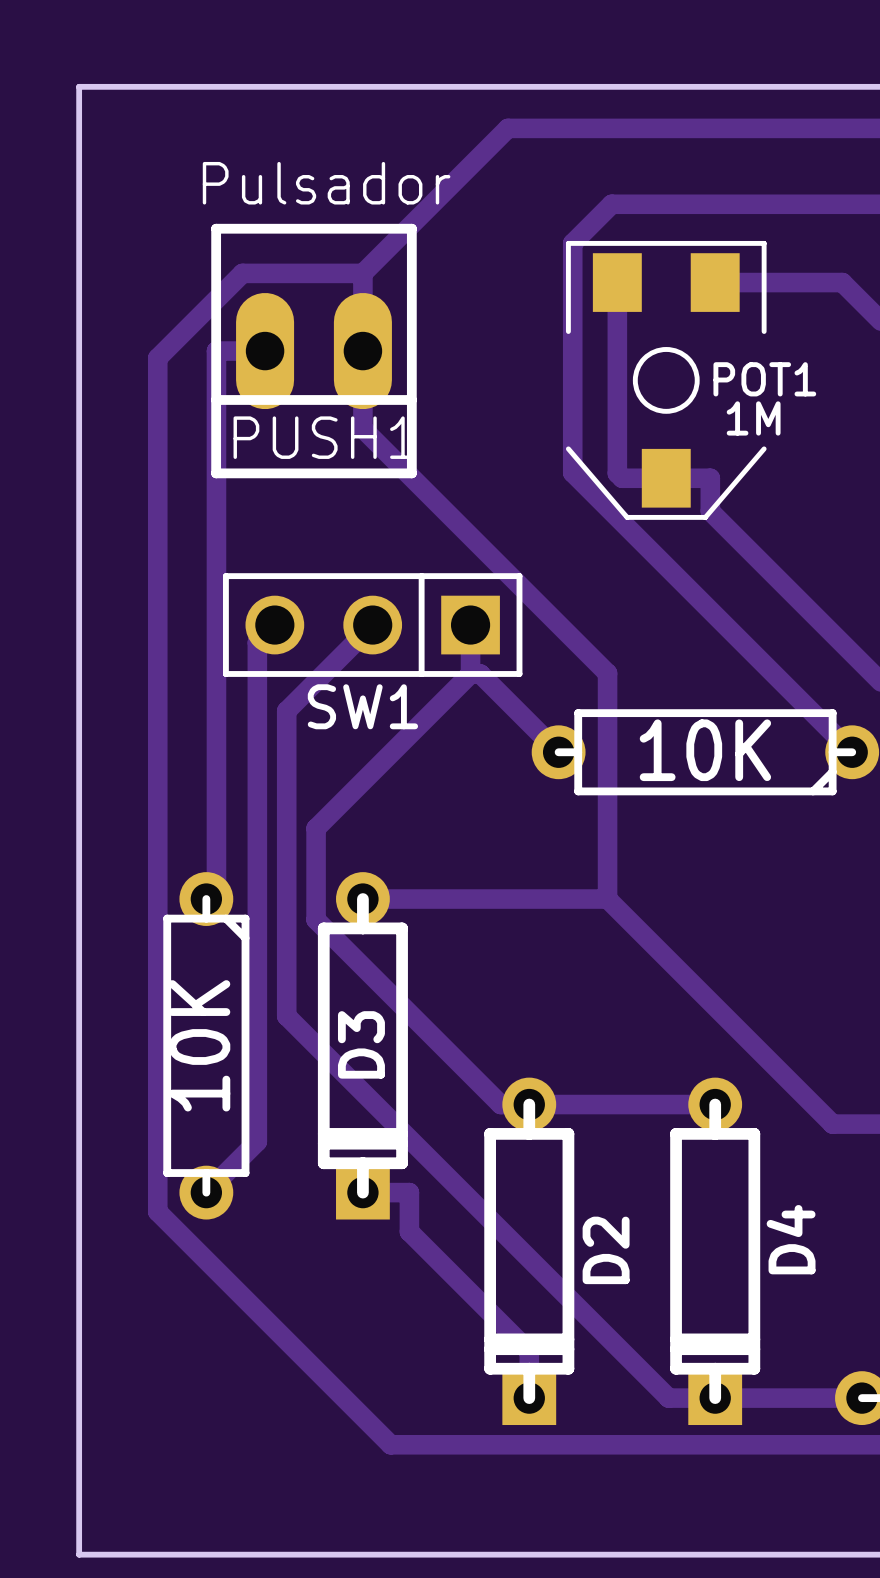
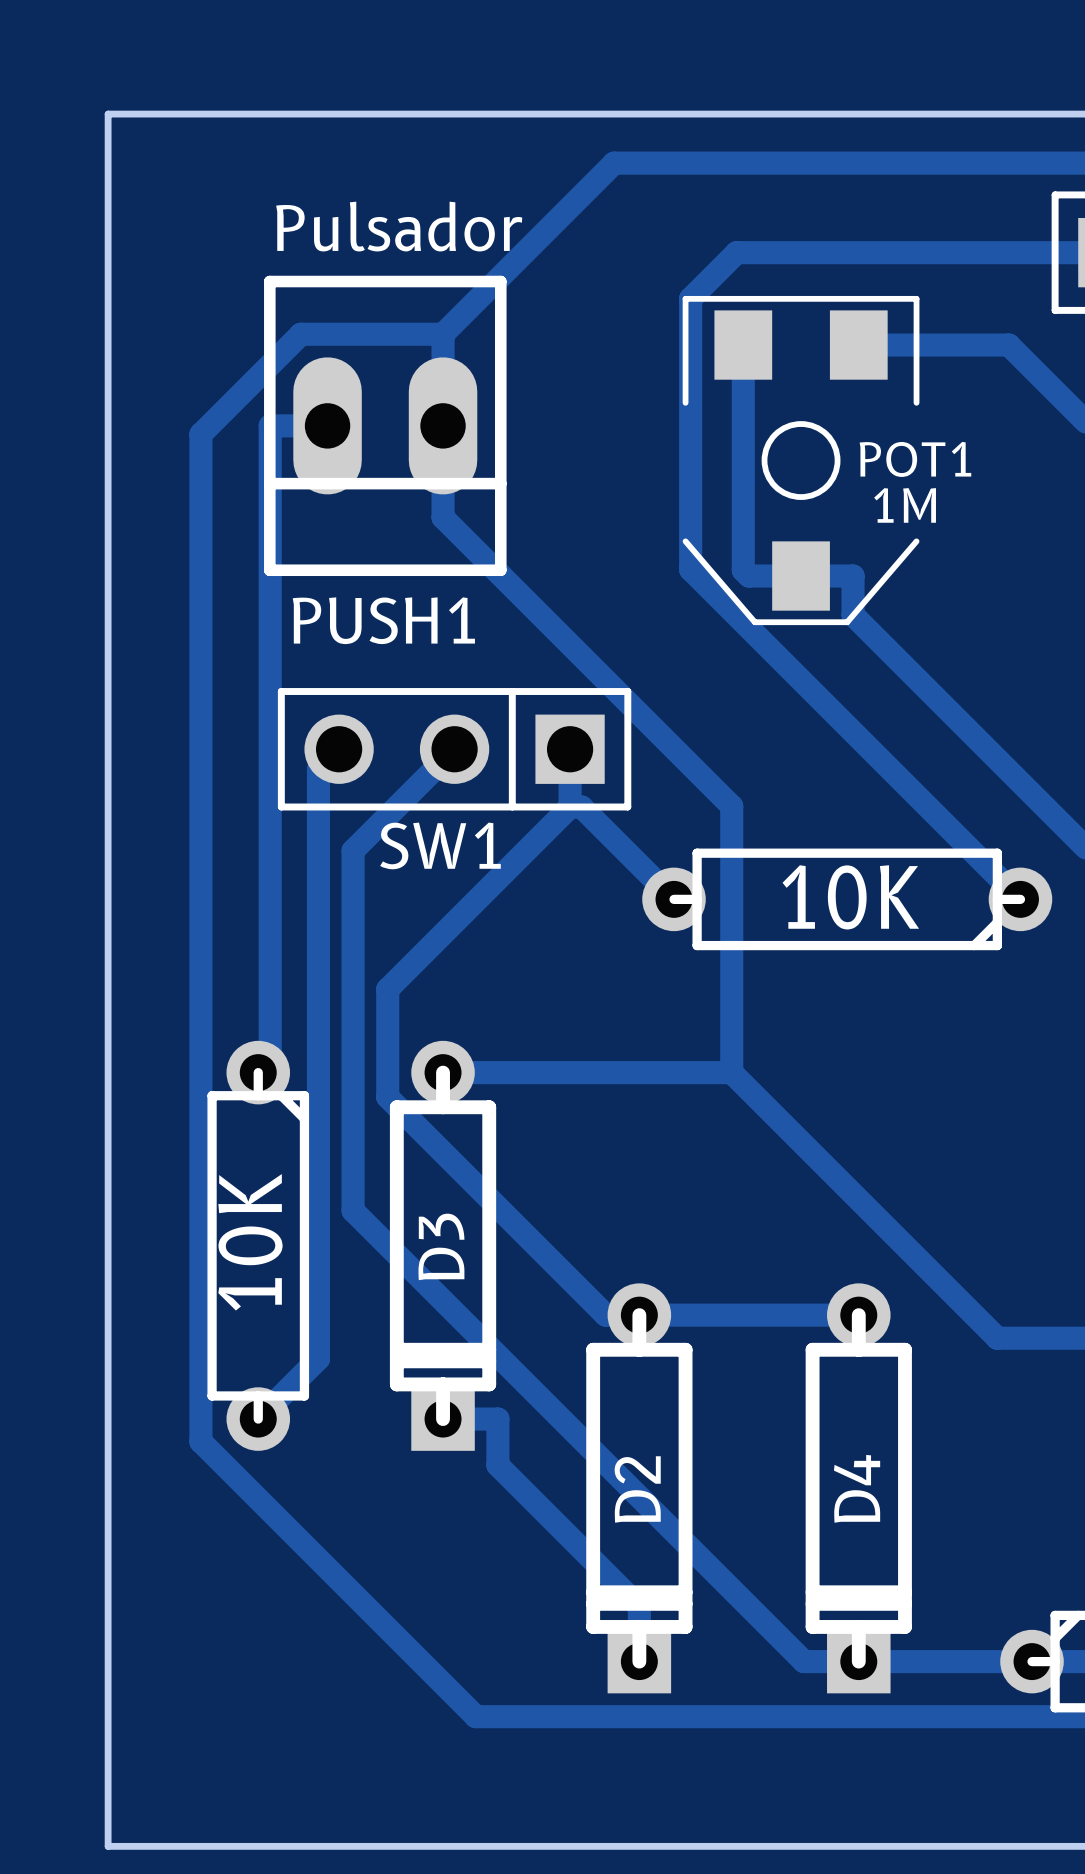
PUSH1 name position: PUSH1 (324, 437) -> PUSH1 (383, 620)
D4 name position: D4 (791, 1239) -> D4 (857, 1488)
D2 name position: D2 (606, 1250) -> D2 (637, 1489)

